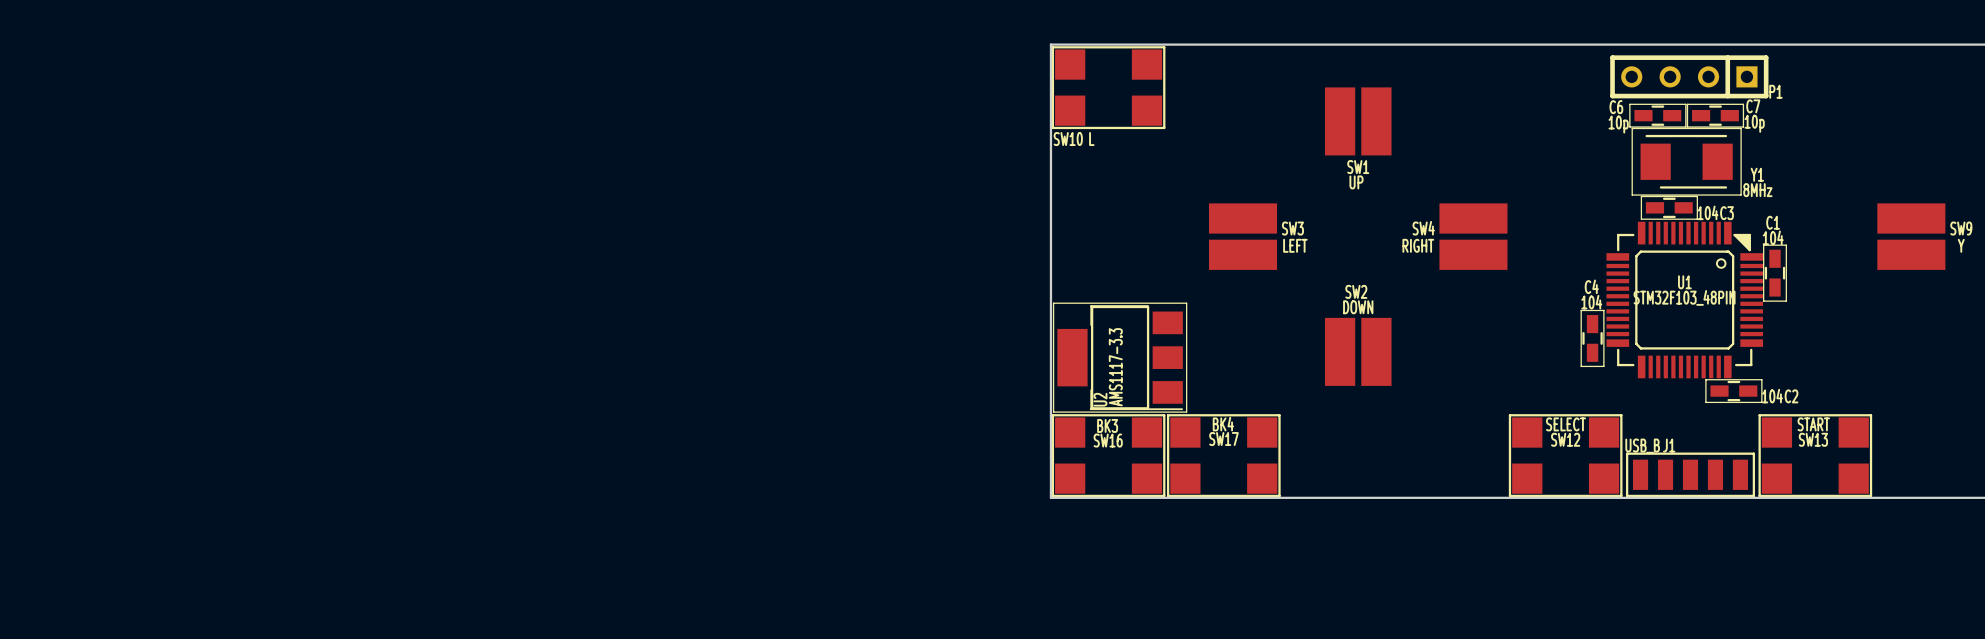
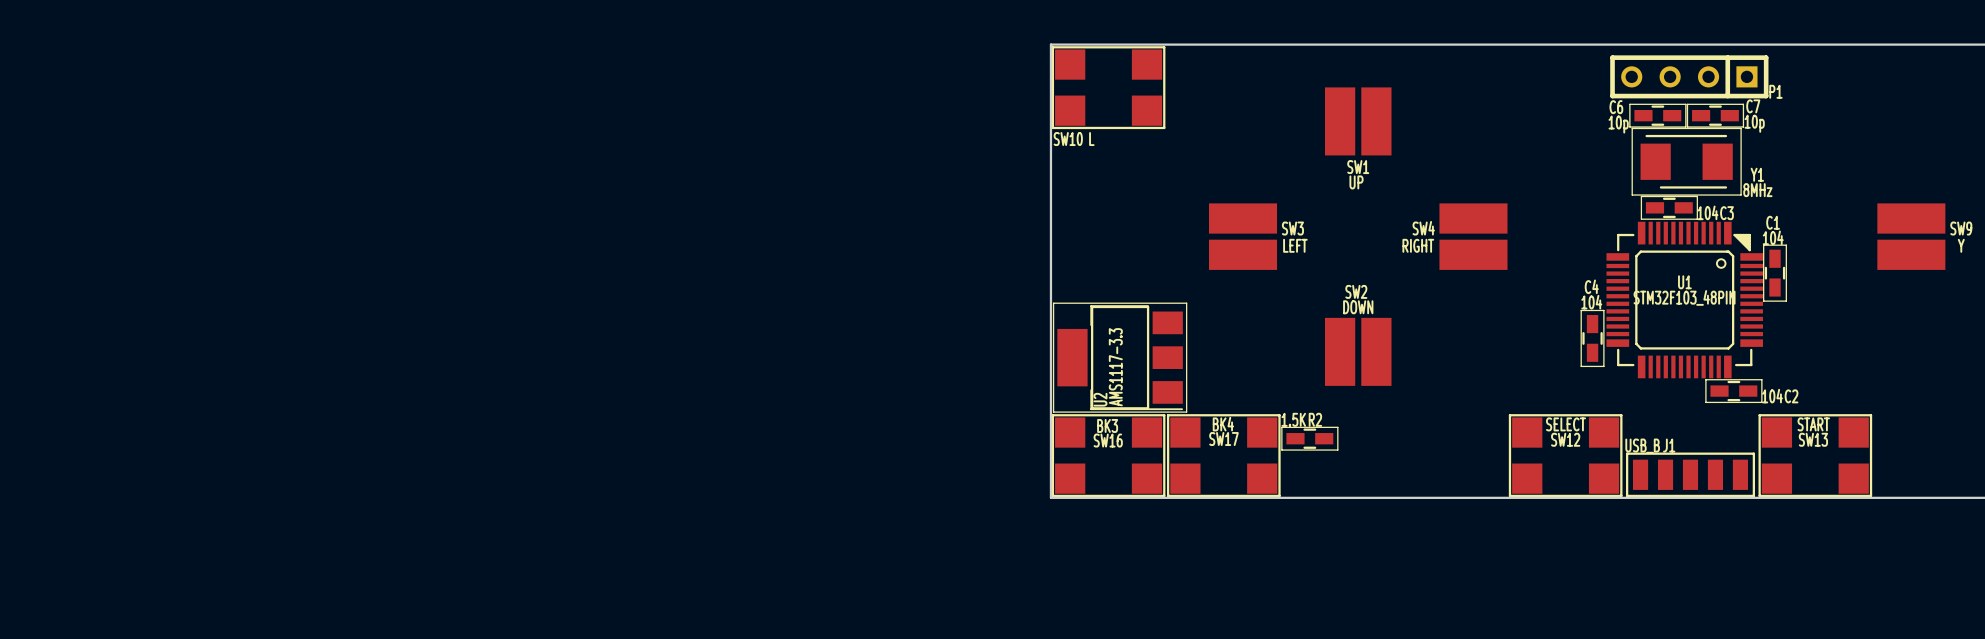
R2: none -> 1.5K (1309, 438)

